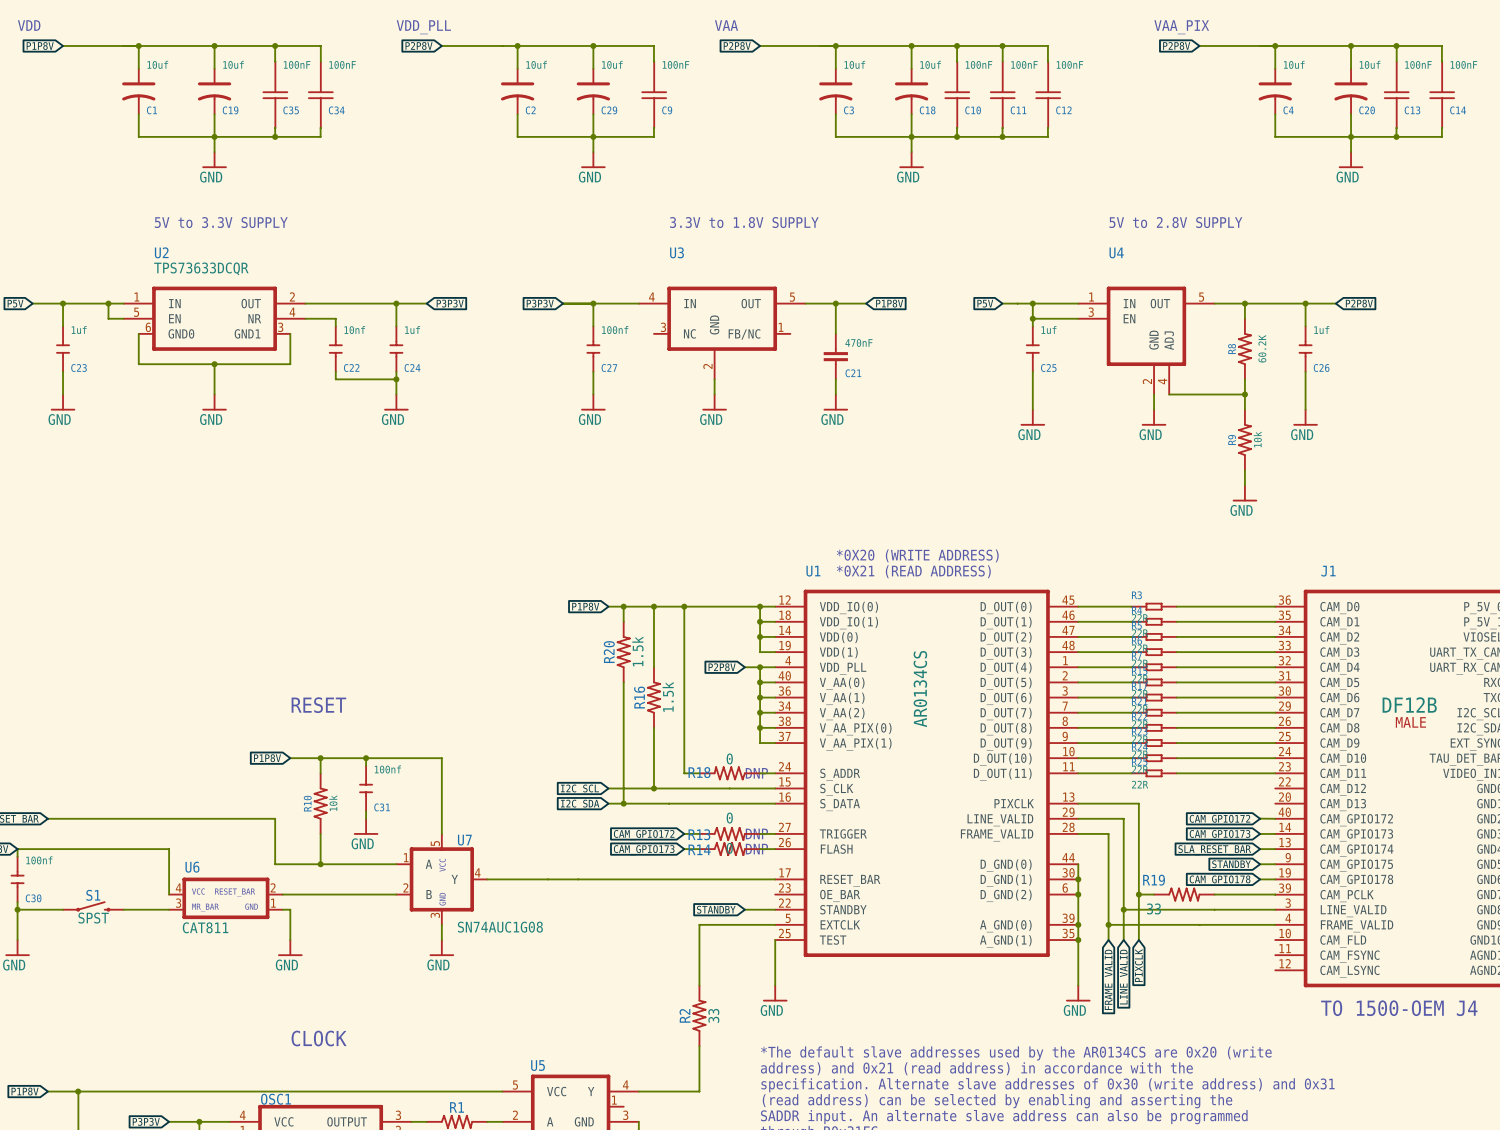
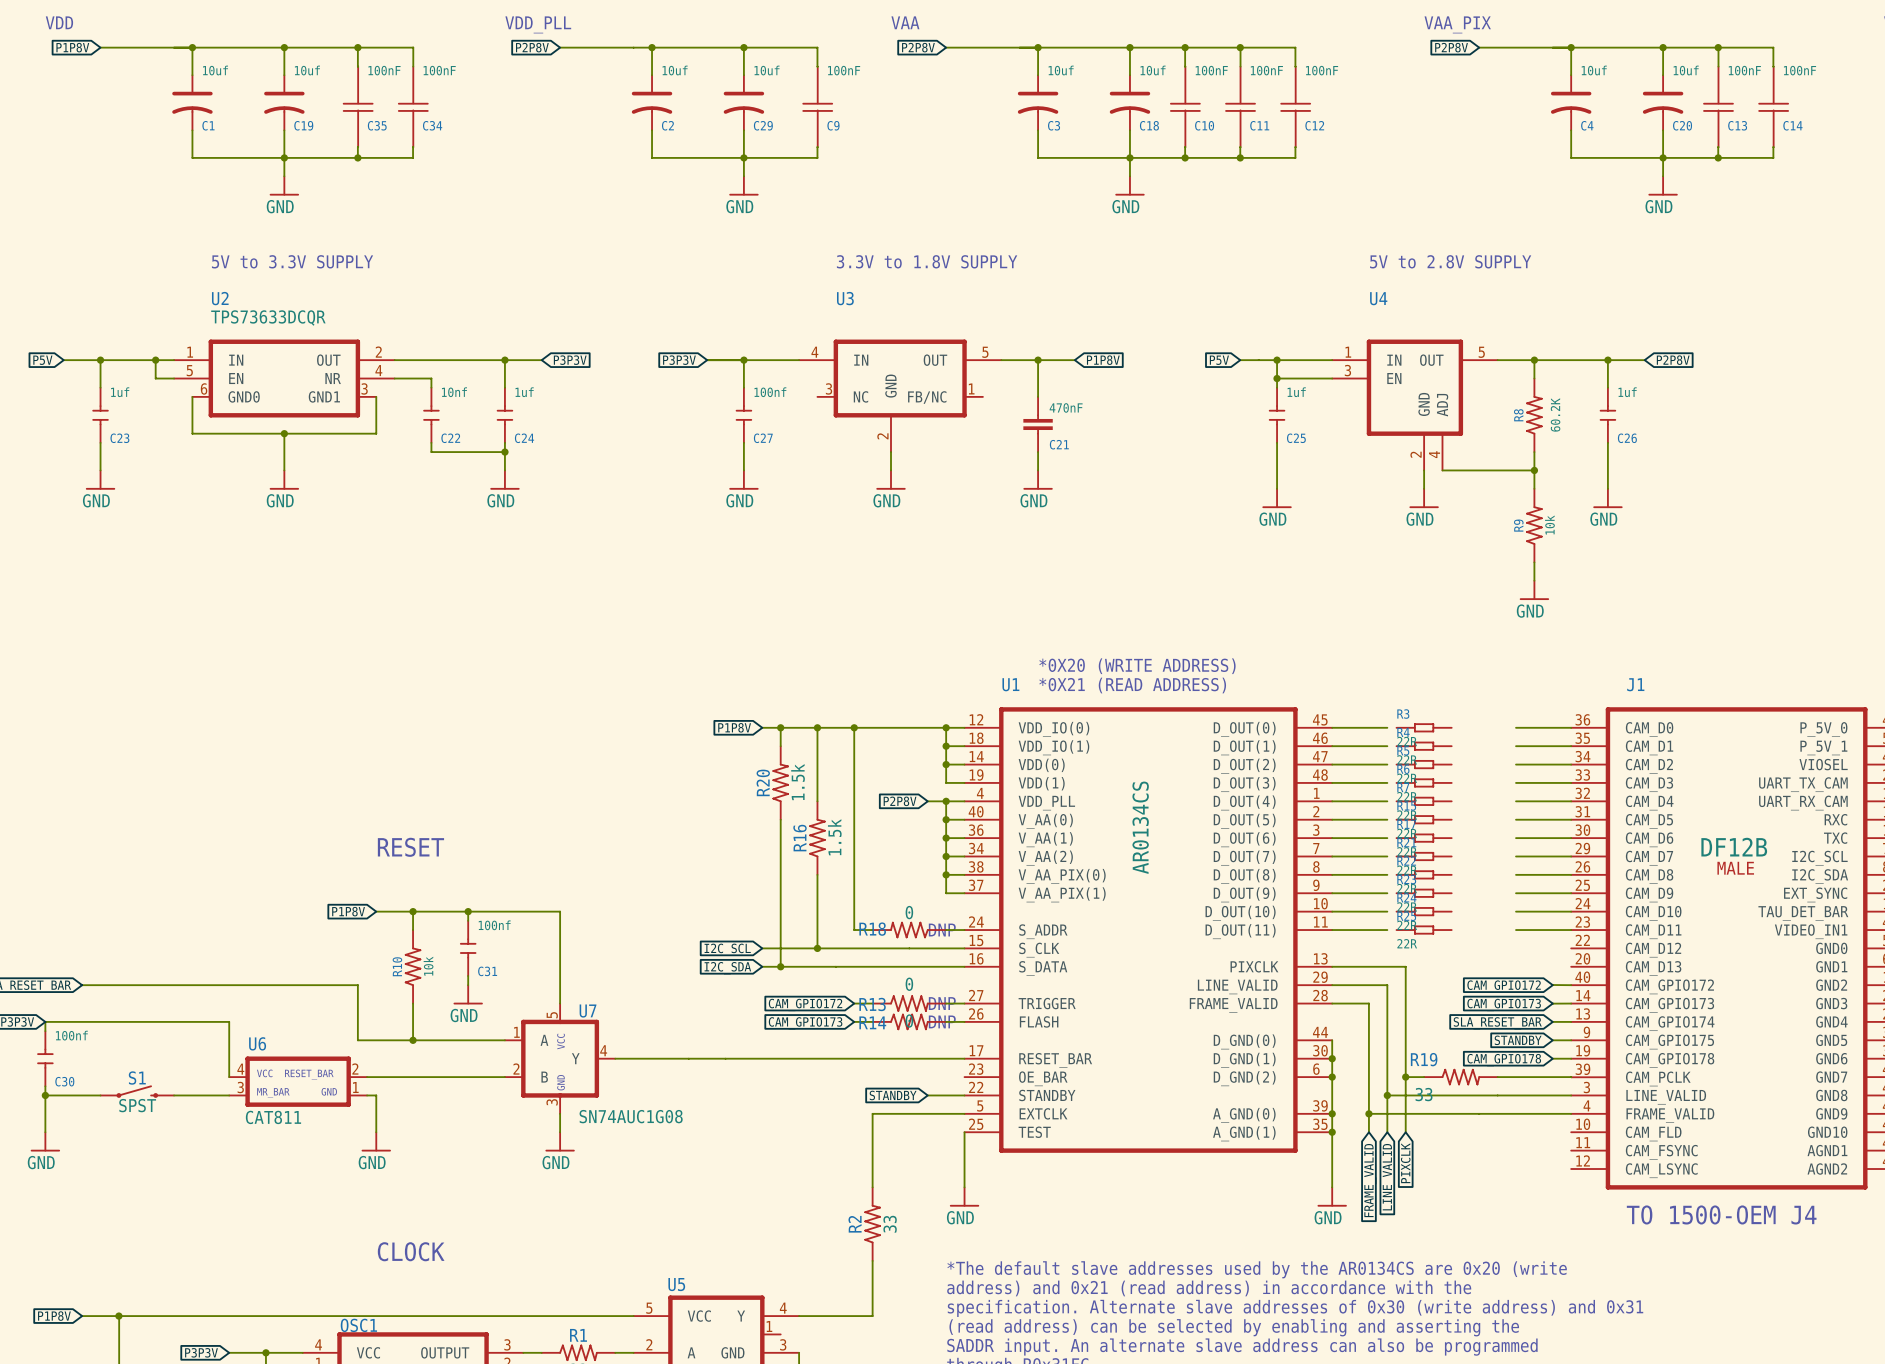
wire: (1123, 606) (1131, 606) -> none
wire: (1176, 606) (1229, 606) -> none
wire: (1123, 621) (1131, 621) -> none
wire: (1176, 621) (1229, 621) -> none
wire: (1123, 636) (1131, 636) -> none
wire: (1176, 636) (1229, 636) -> none
wire: (1123, 652) (1131, 652) -> none
wire: (1176, 652) (1229, 652) -> none
wire: (1123, 667) (1131, 667) -> none
wire: (1176, 667) (1229, 667) -> none
wire: (1123, 682) (1131, 682) -> none
wire: (1176, 682) (1229, 682) -> none
wire: (1123, 697) (1131, 697) -> none
wire: (1176, 697) (1229, 697) -> none
wire: (1123, 712) (1131, 712) -> none
wire: (1176, 712) (1229, 712) -> none
wire: (1123, 727) (1131, 727) -> none
wire: (1176, 727) (1229, 727) -> none
wire: (1123, 743) (1131, 743) -> none
wire: (1176, 743) (1229, 743) -> none
wire: (1123, 758) (1131, 758) -> none
wire: (1176, 758) (1229, 758) -> none
wire: (1123, 773) (1131, 773) -> none
wire: (1176, 773) (1229, 773) -> none

